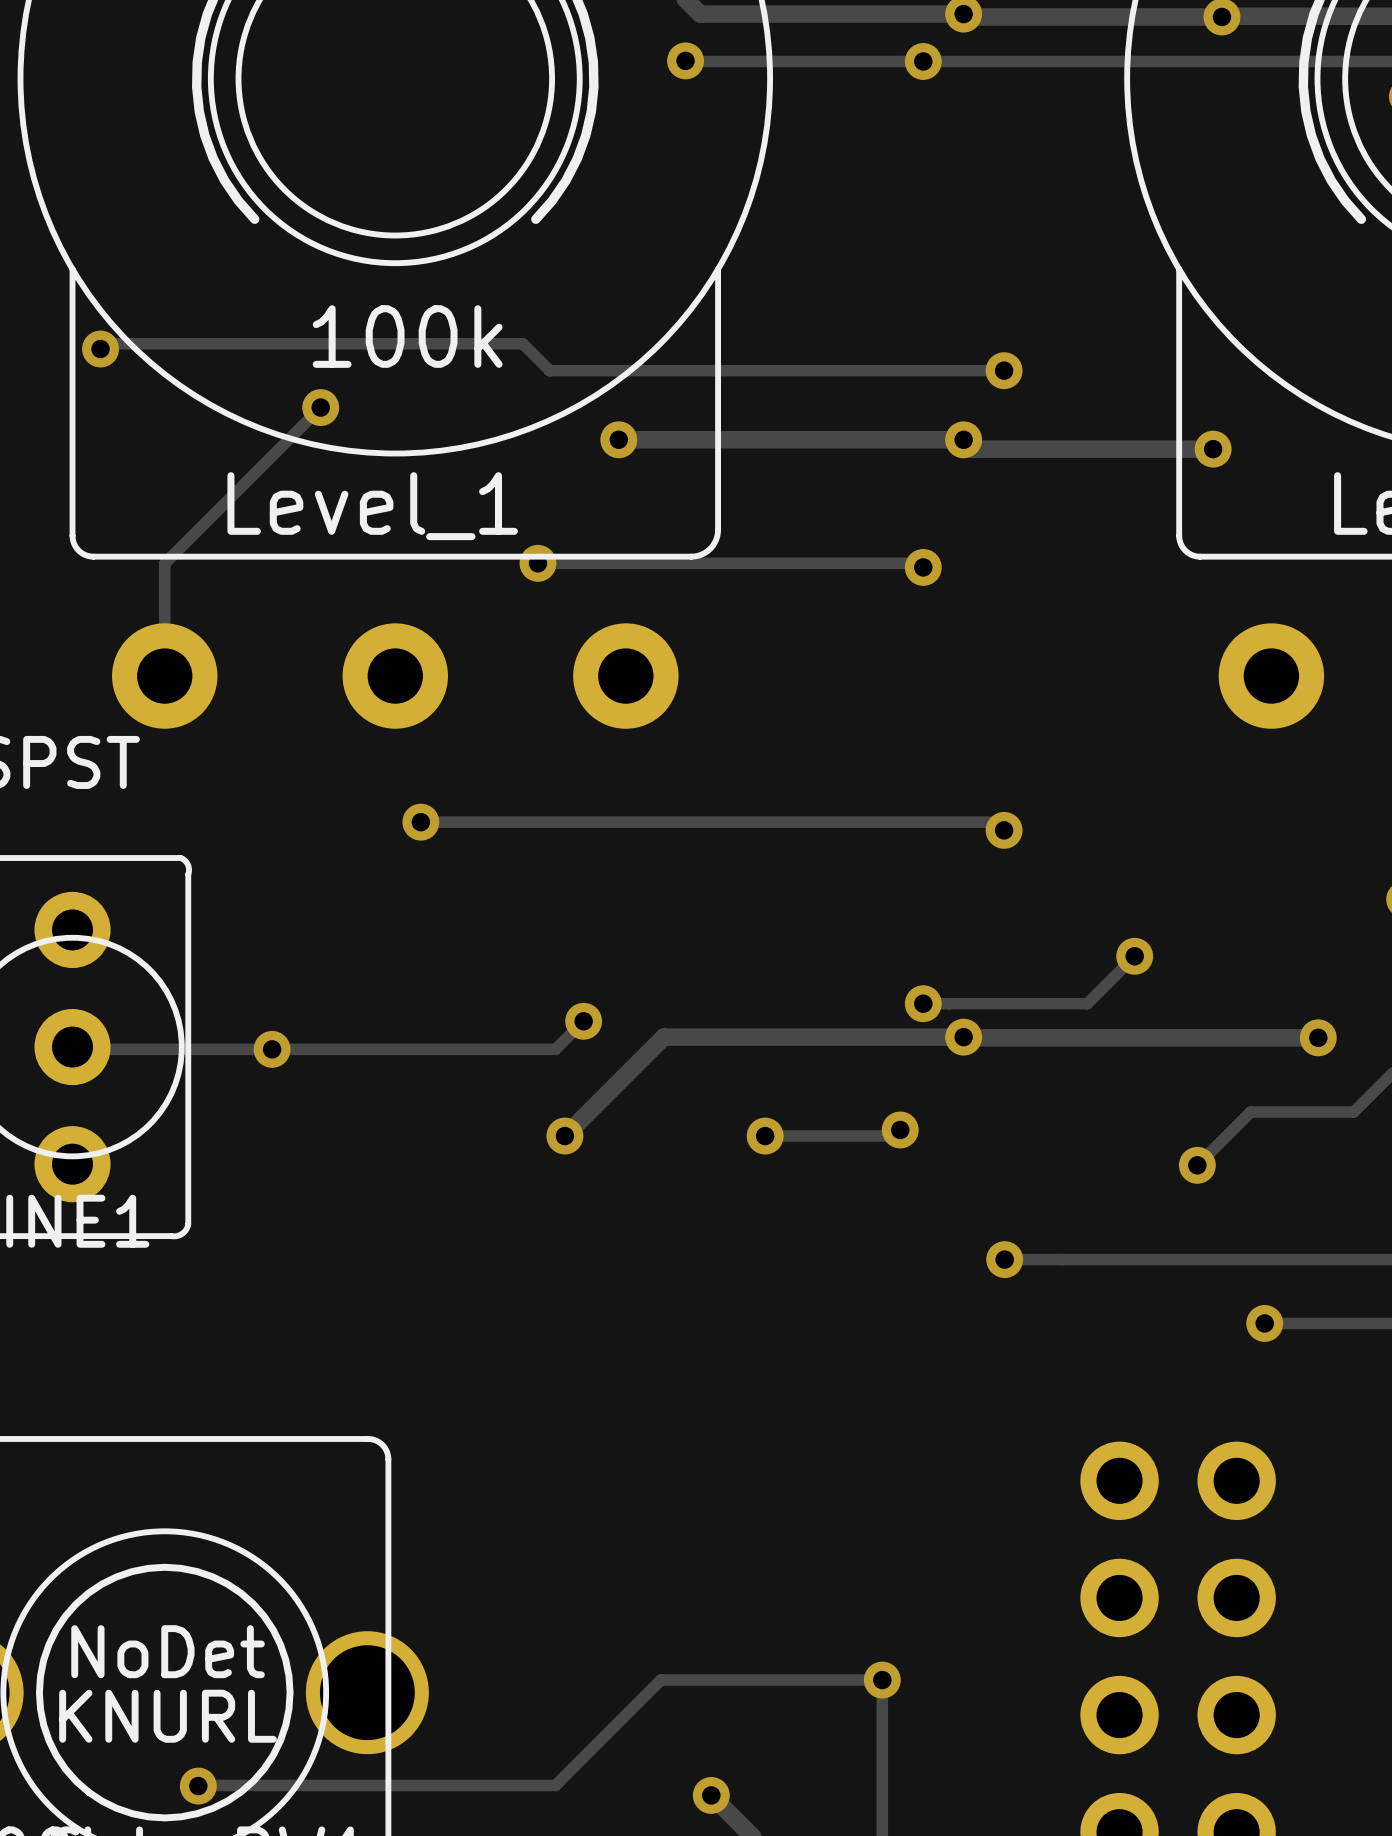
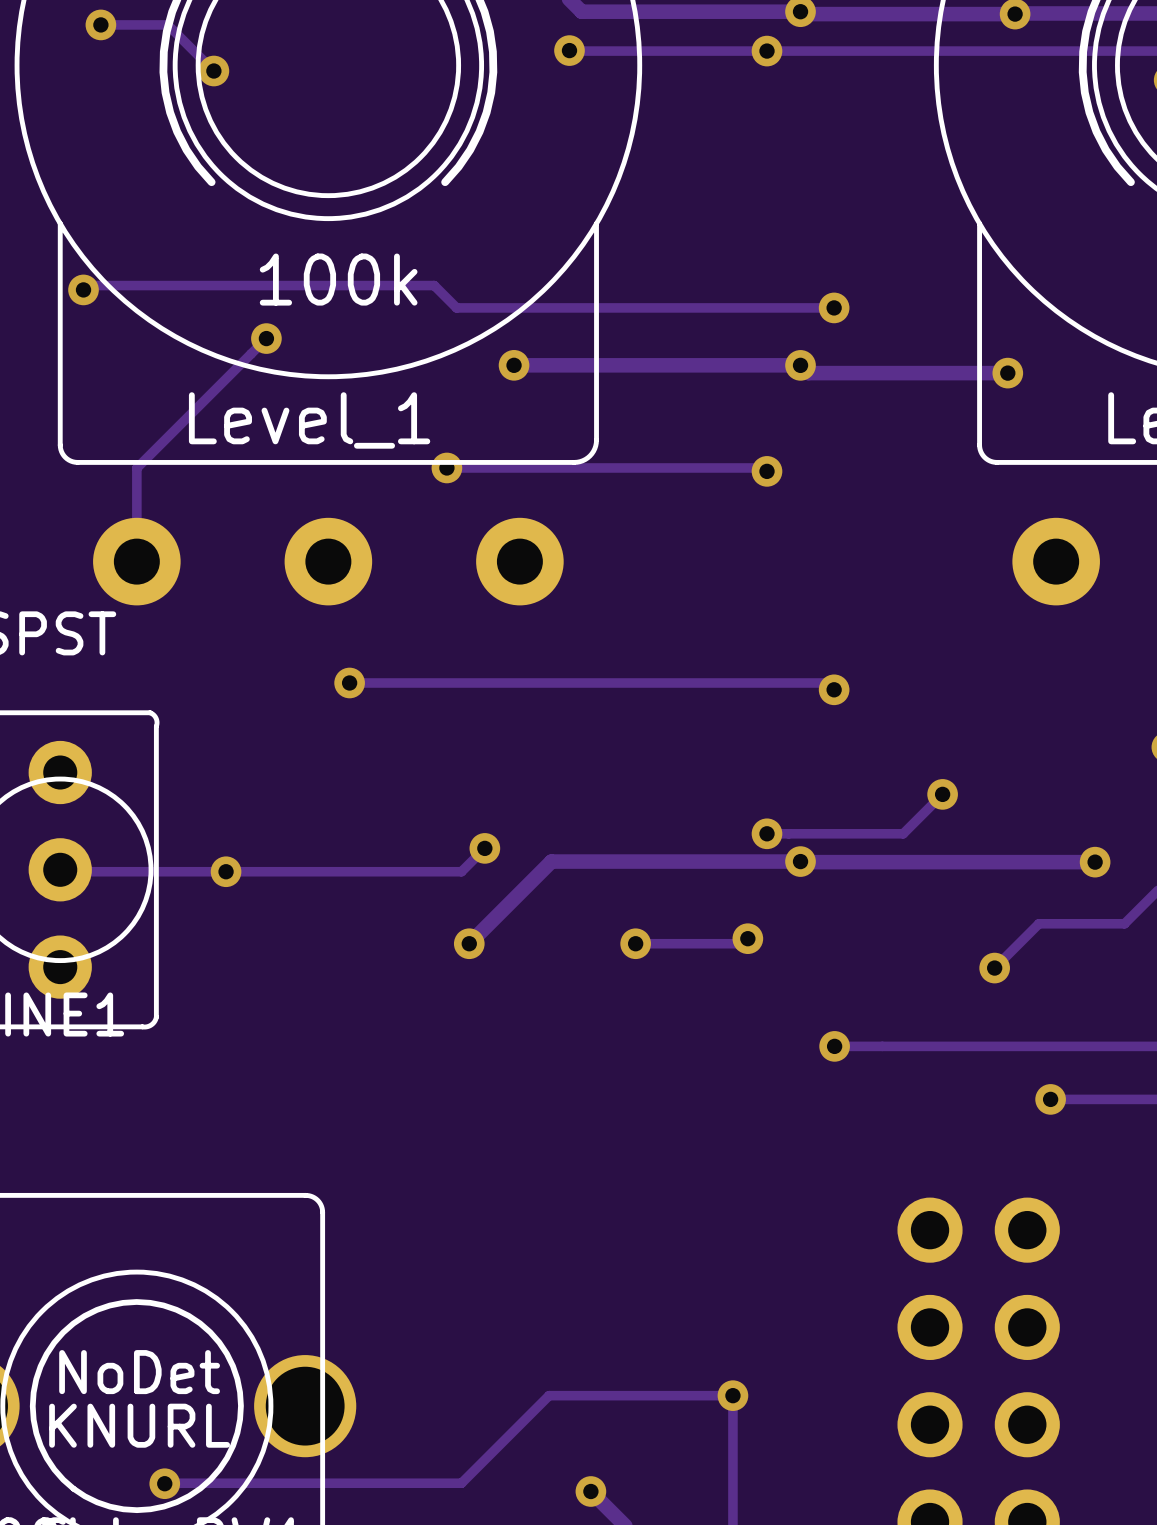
track: none -> (100, 24) (167, 24) (213, 71)
via: none -> (100, 24)
via: none -> (213, 71)

